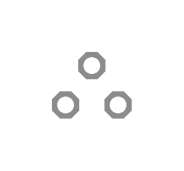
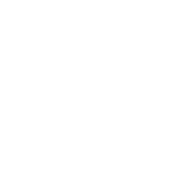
part: (91, 85) -> none

